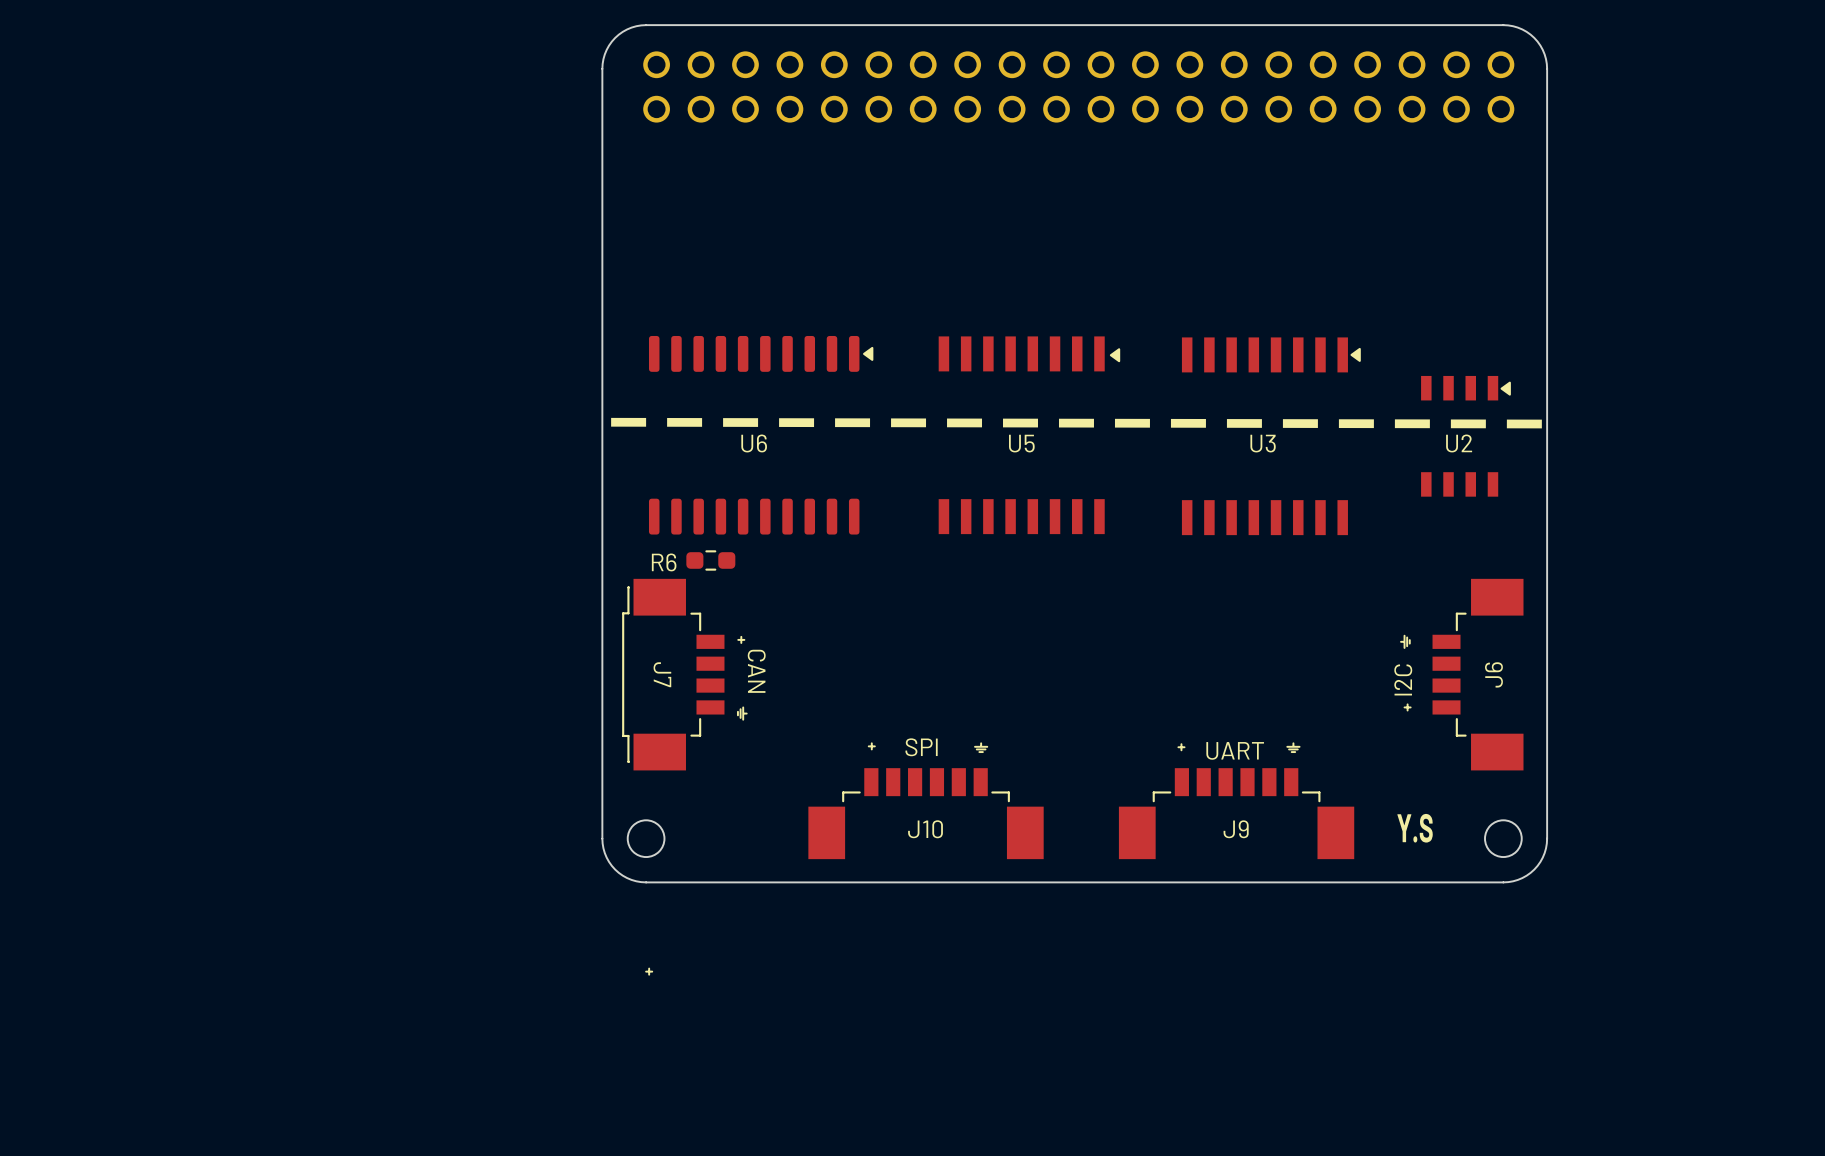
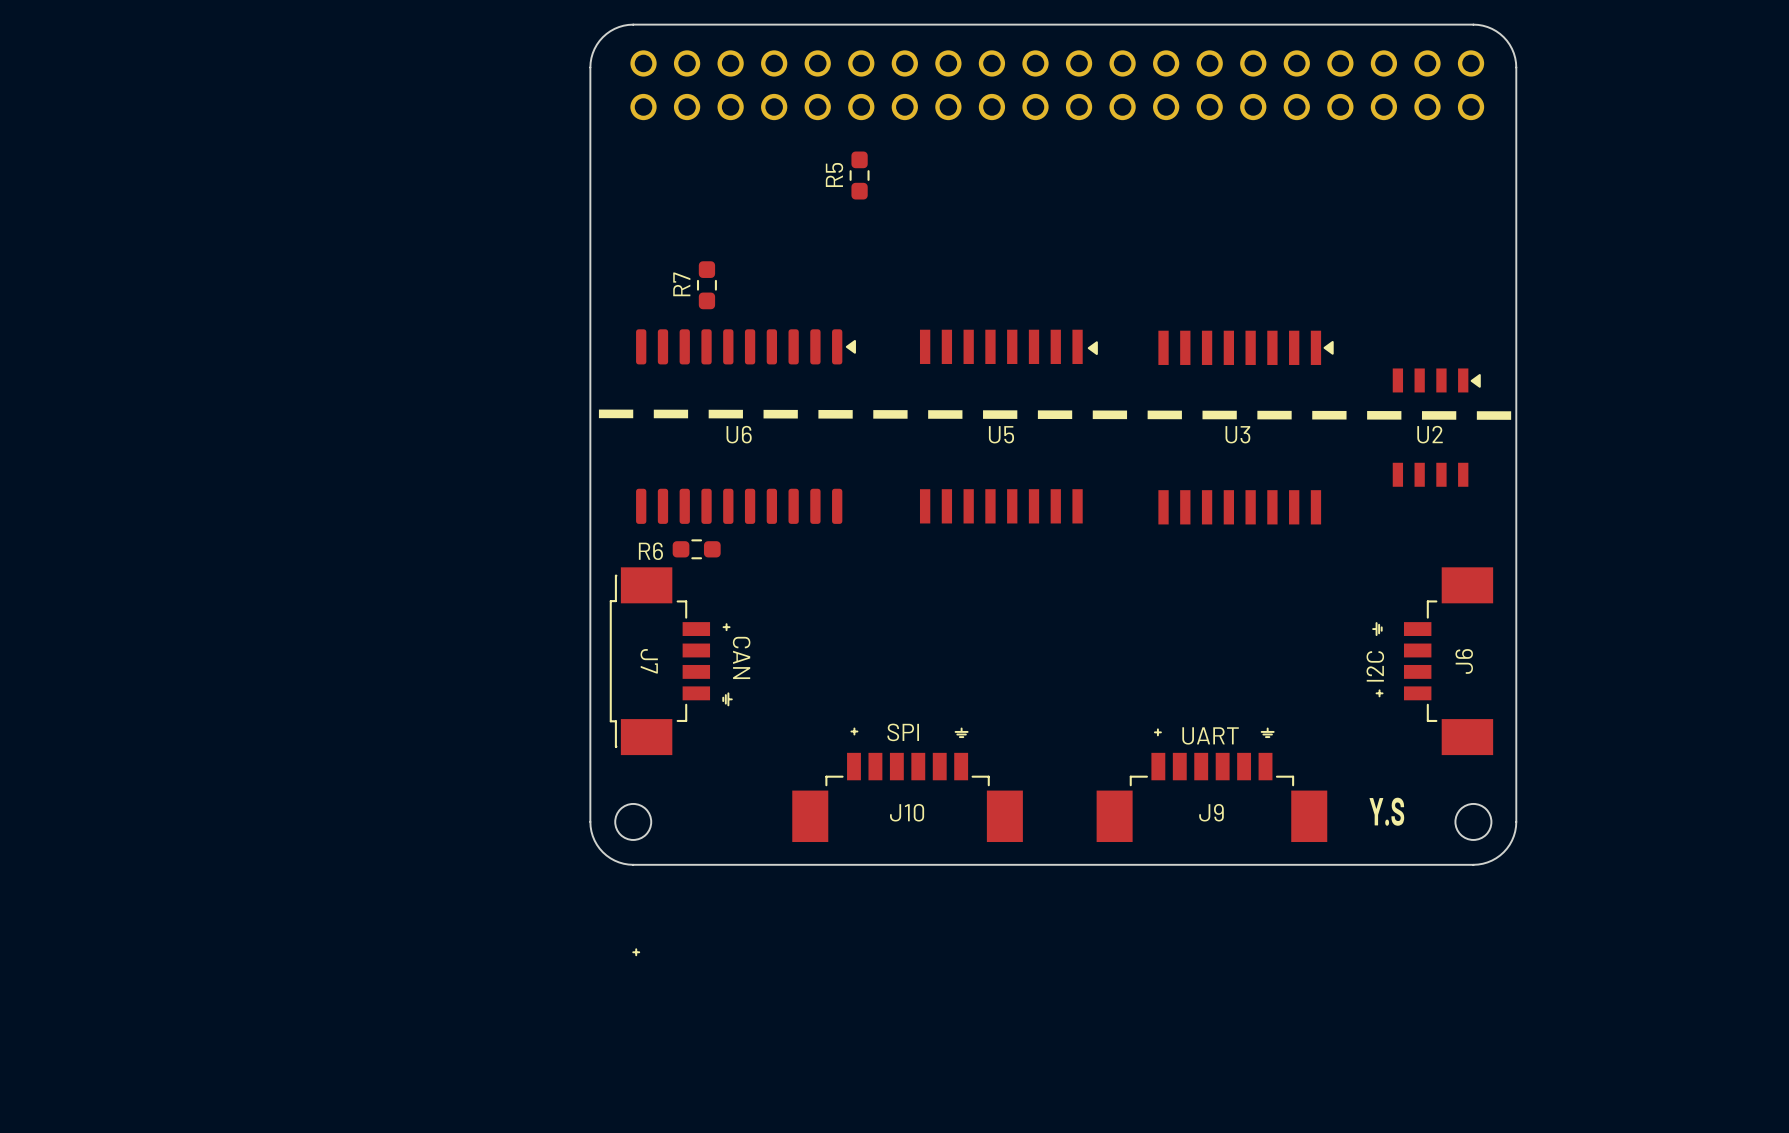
R5: none -> (859, 175)
R7: none -> (706, 285)

